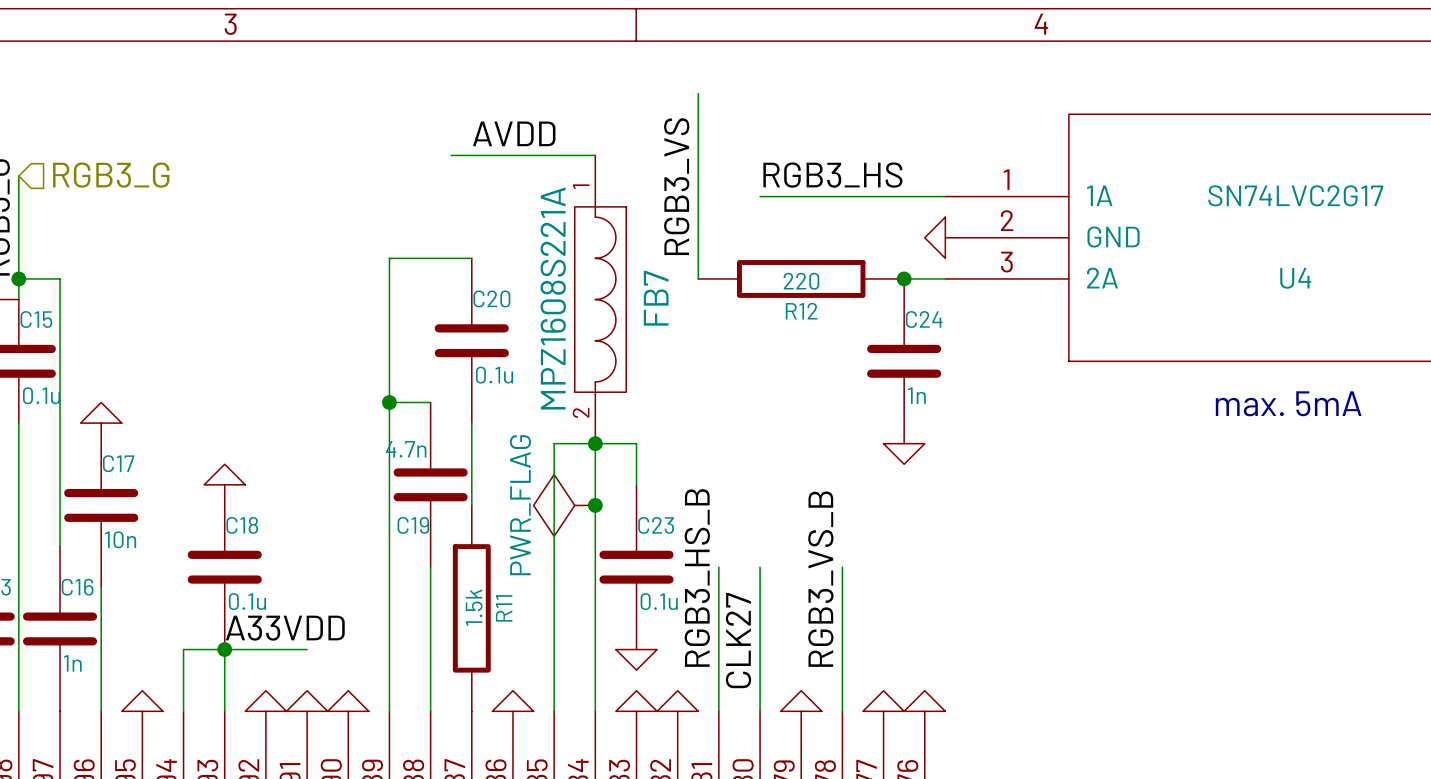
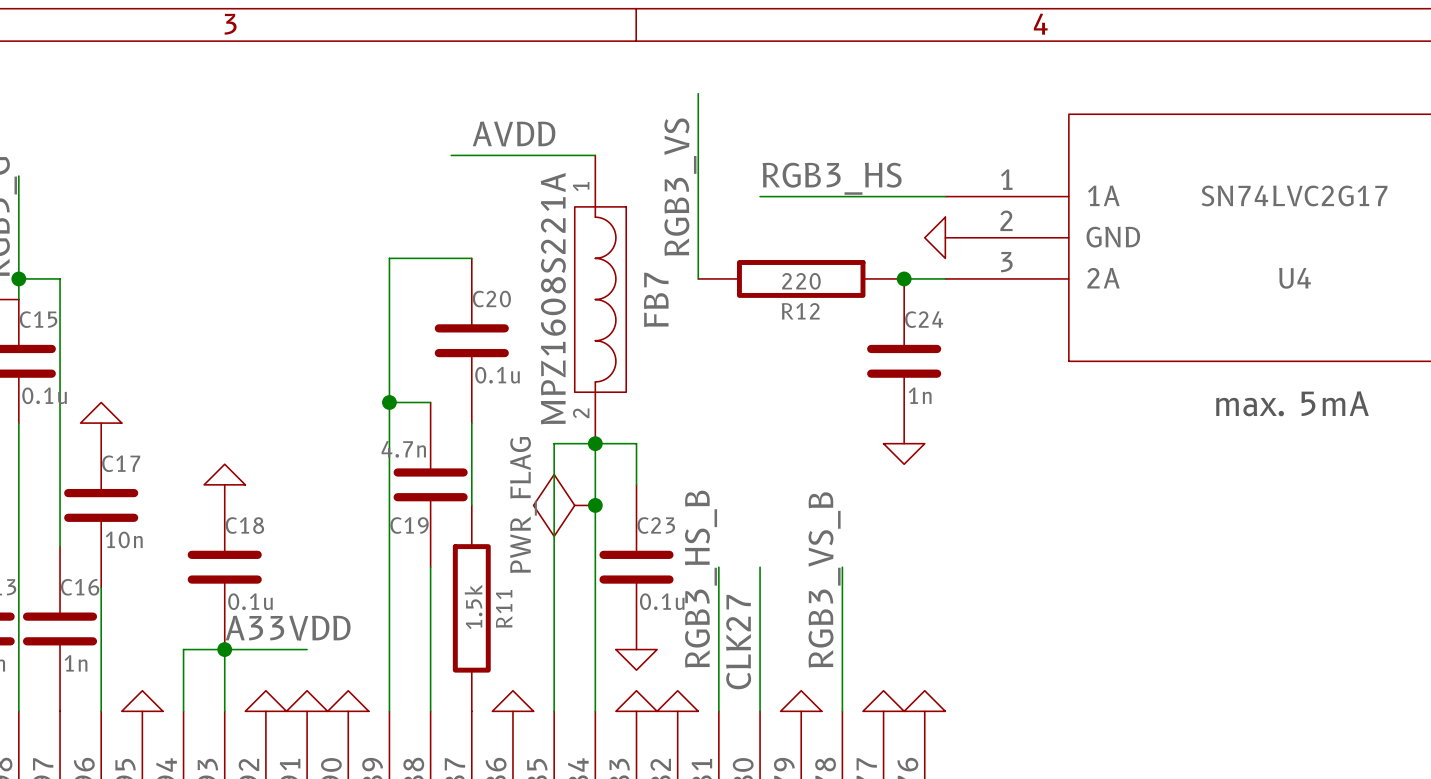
hierarchical label: RGB3_G (111, 175) -> none

